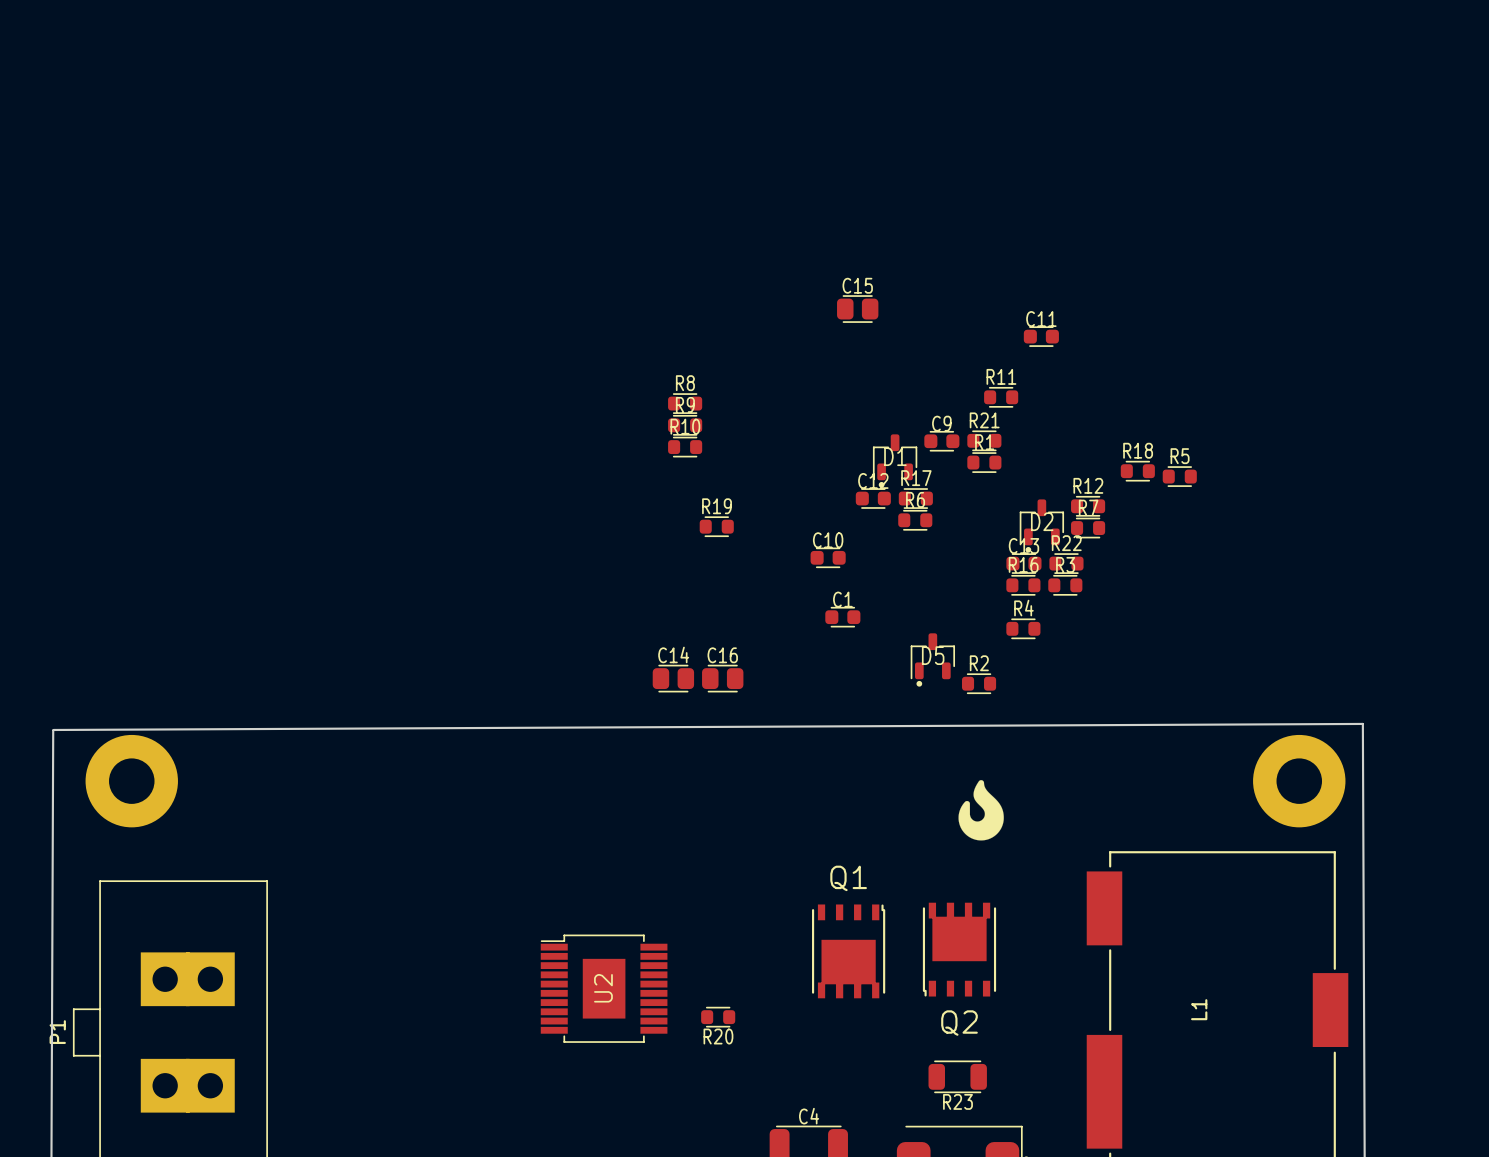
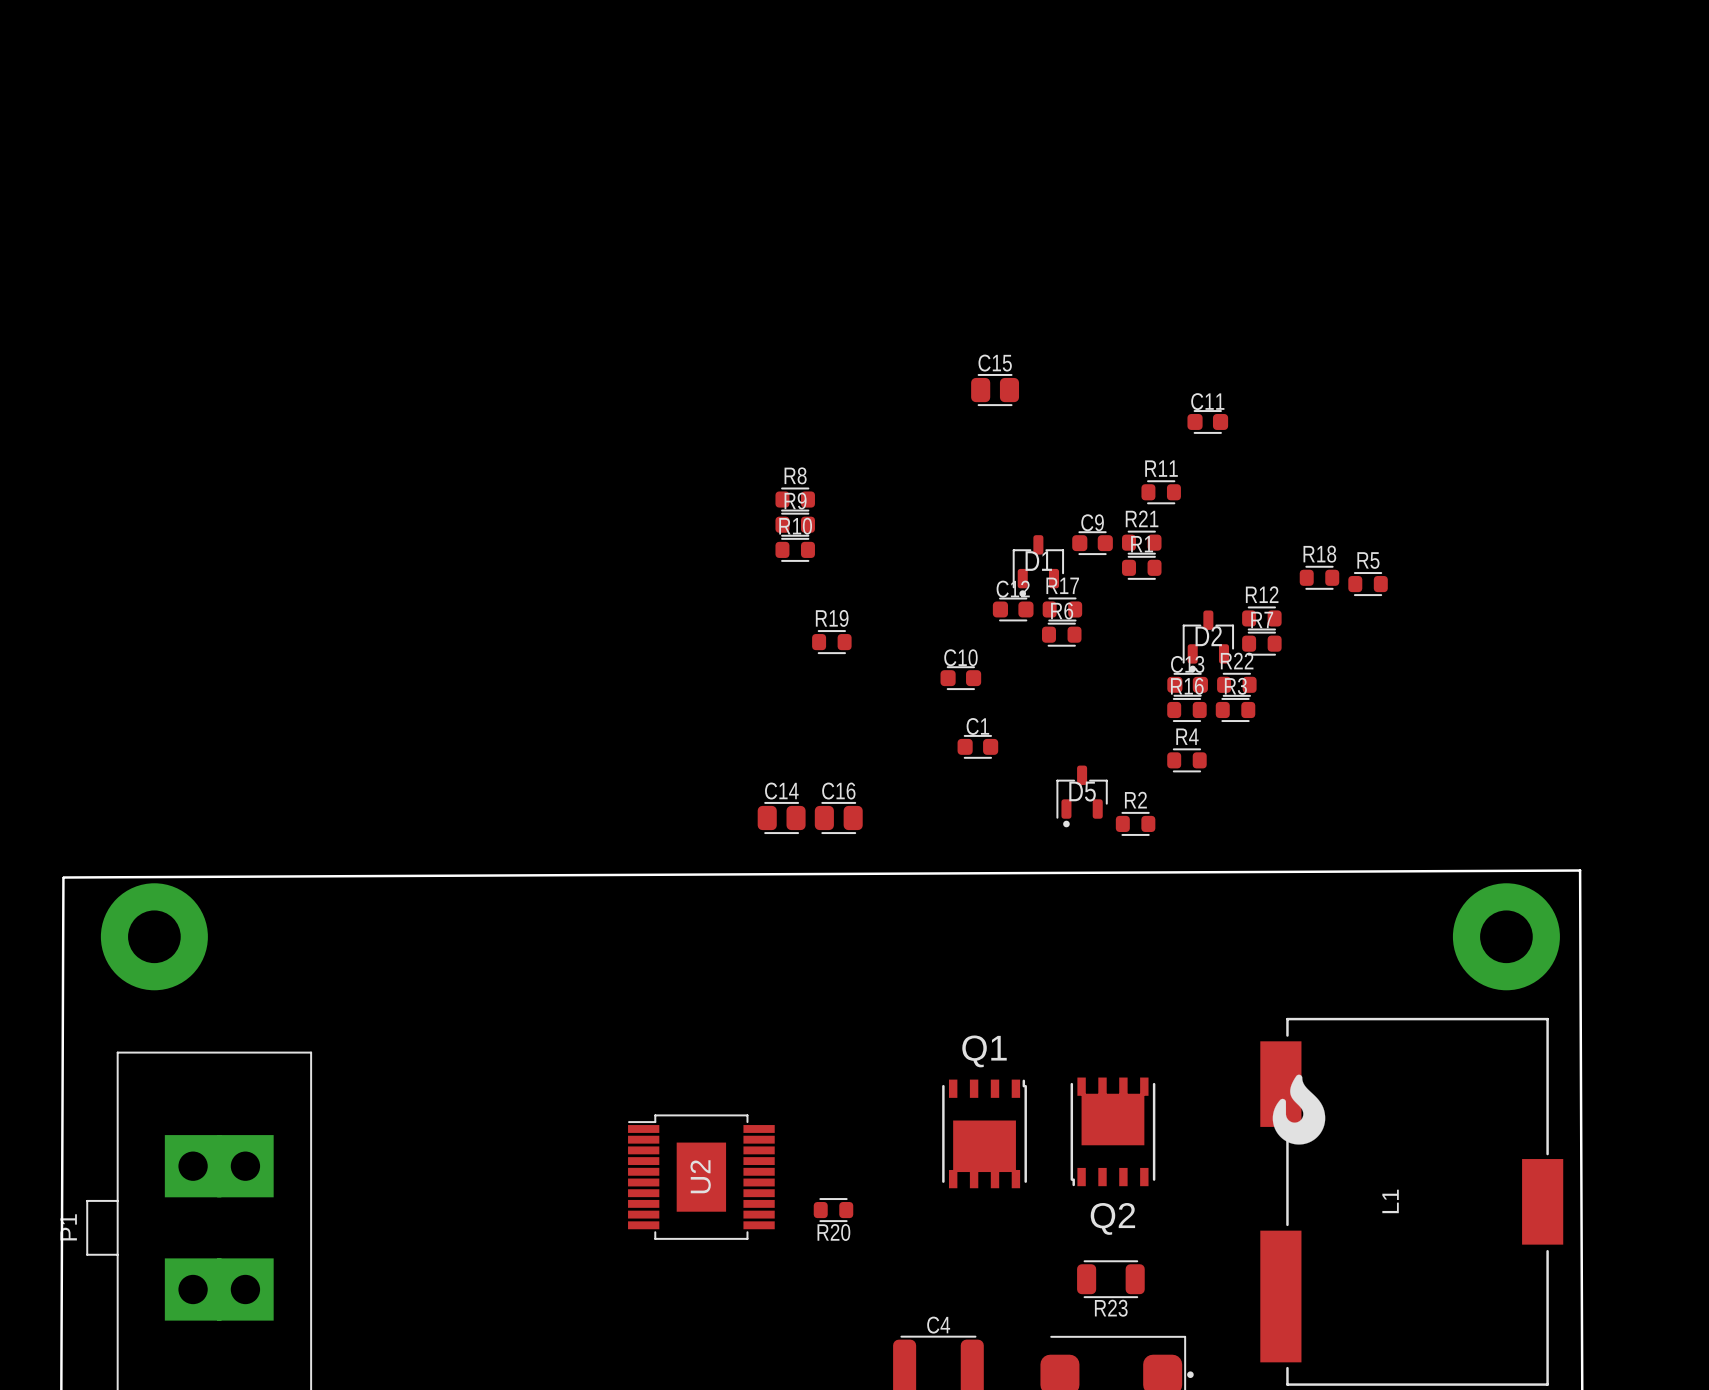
drawing position: (981, 810) -> (1298, 1109)

